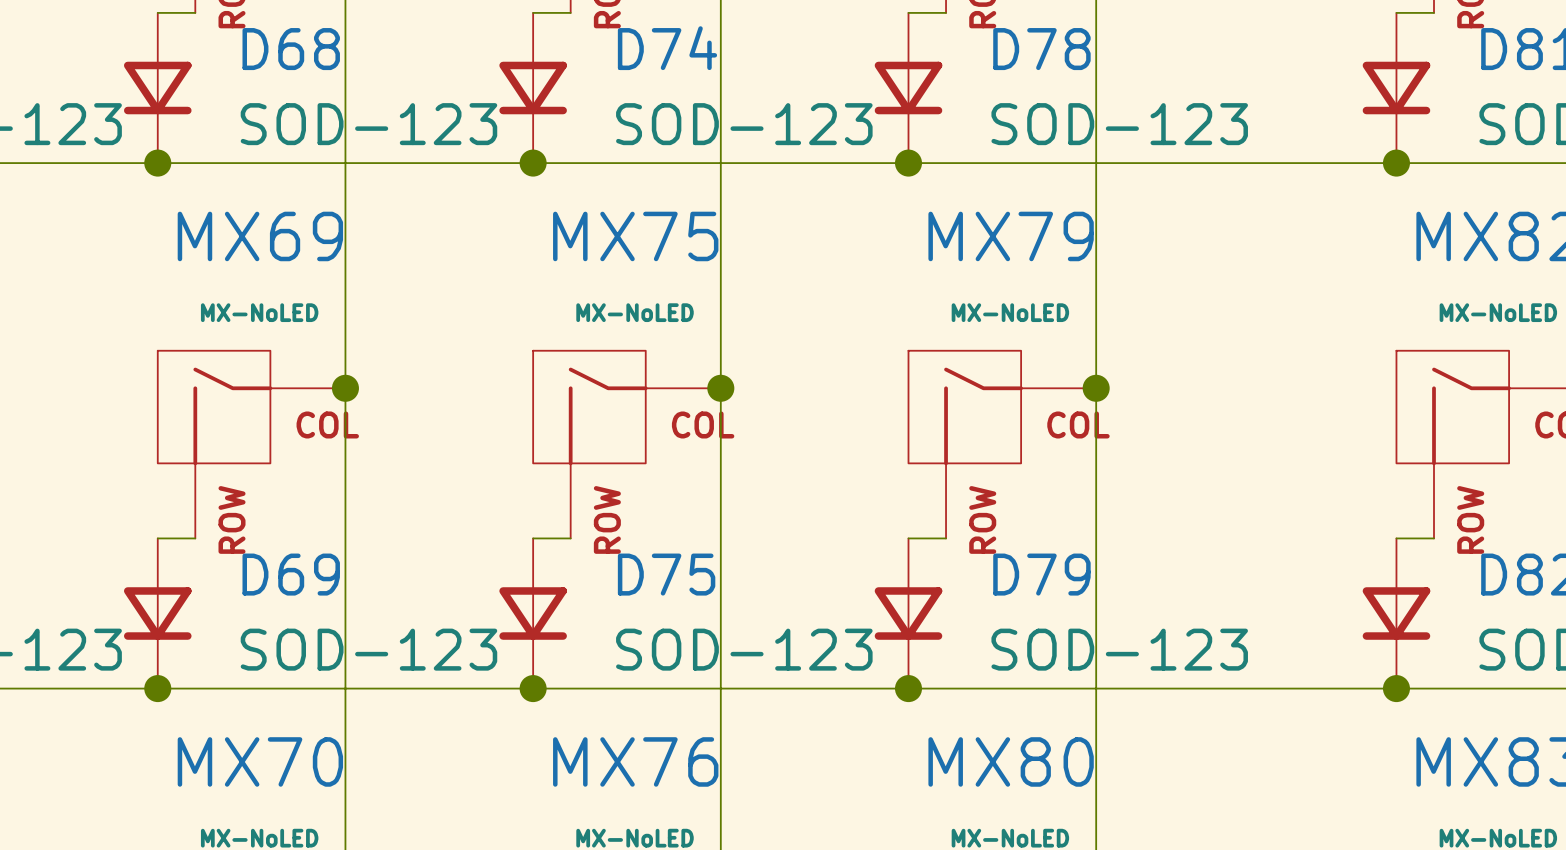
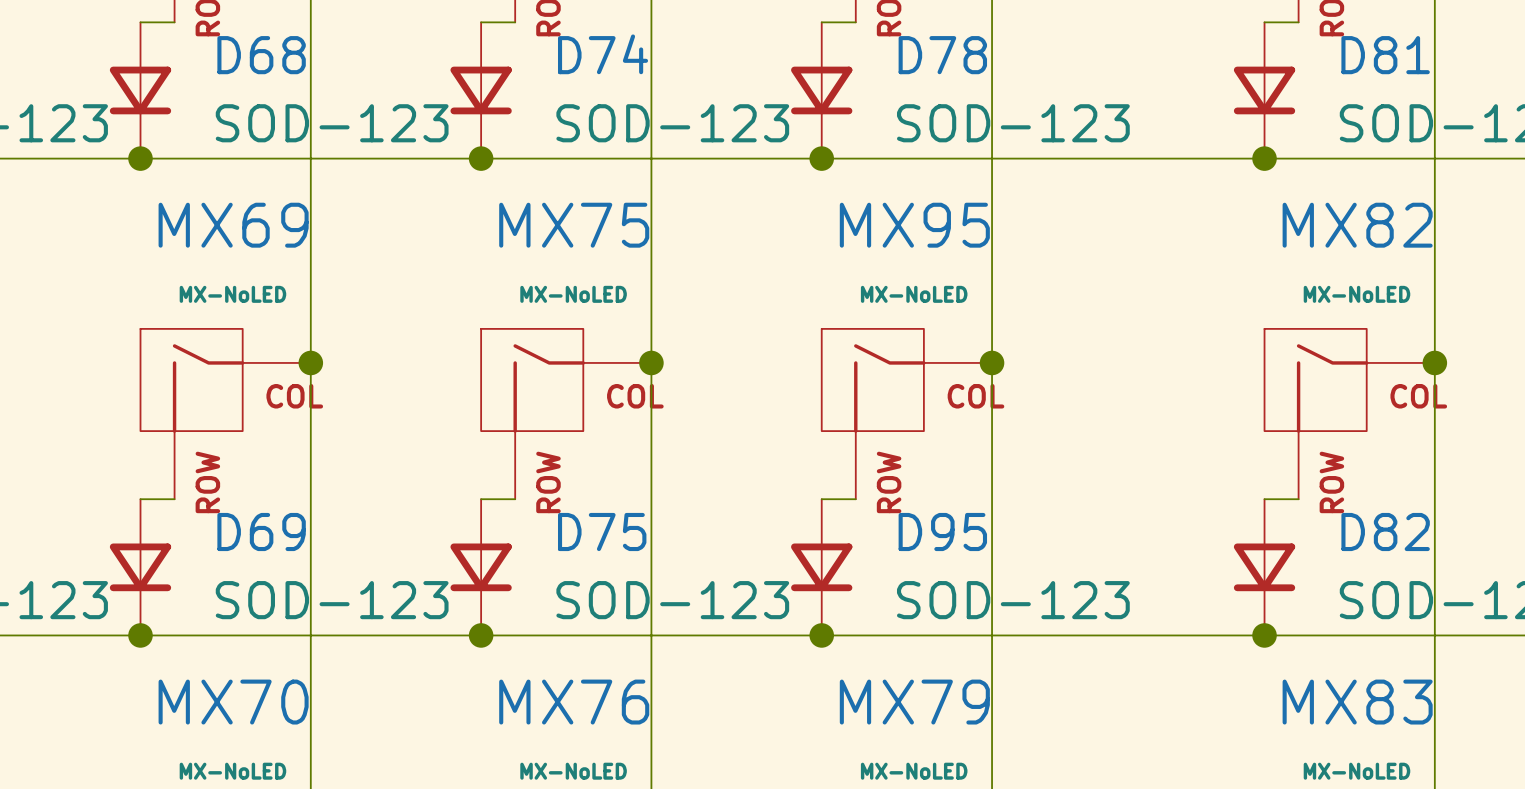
MX79 name: MX79 (1011, 236) -> MX95 (914, 225)
D79 name: D79 (1041, 574) -> D95 (942, 532)
MX80 name: MX80 (1011, 761) -> MX79 (914, 702)

